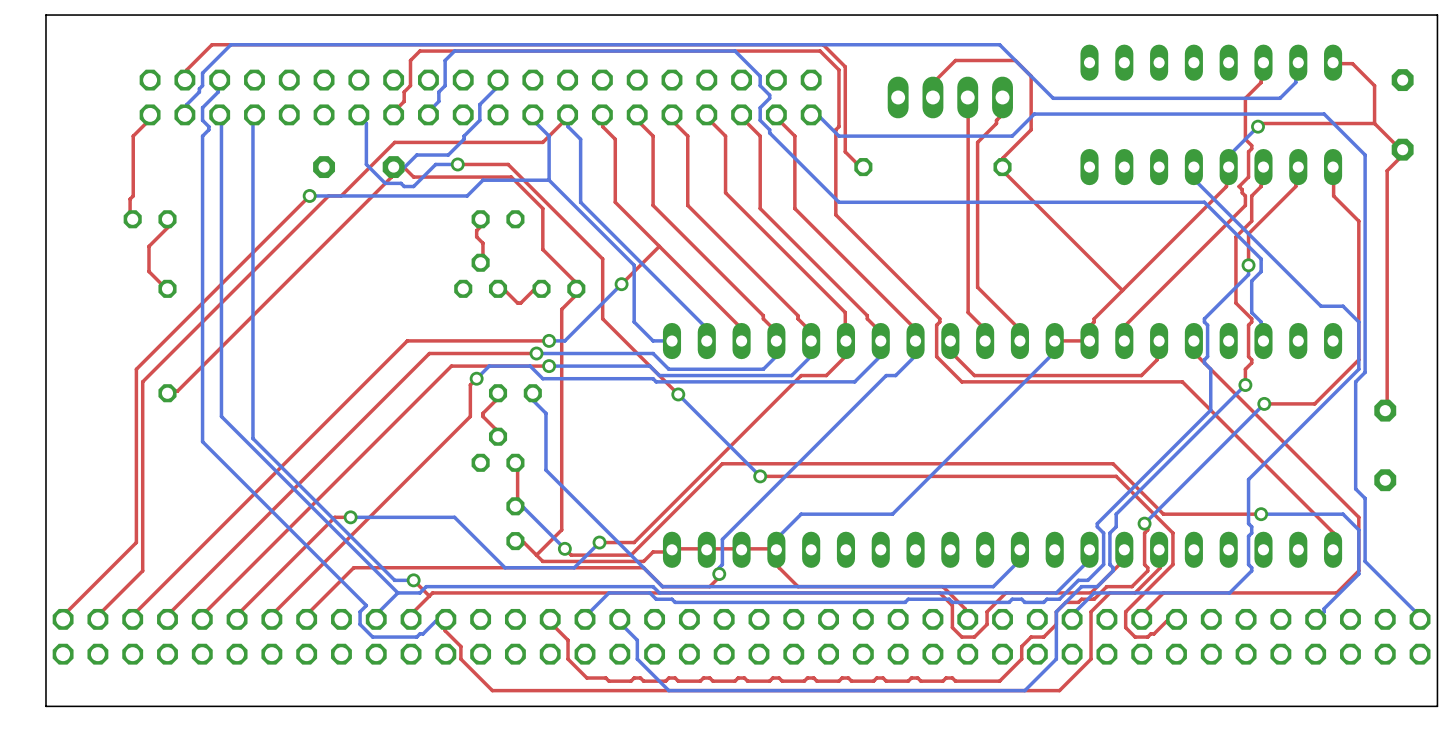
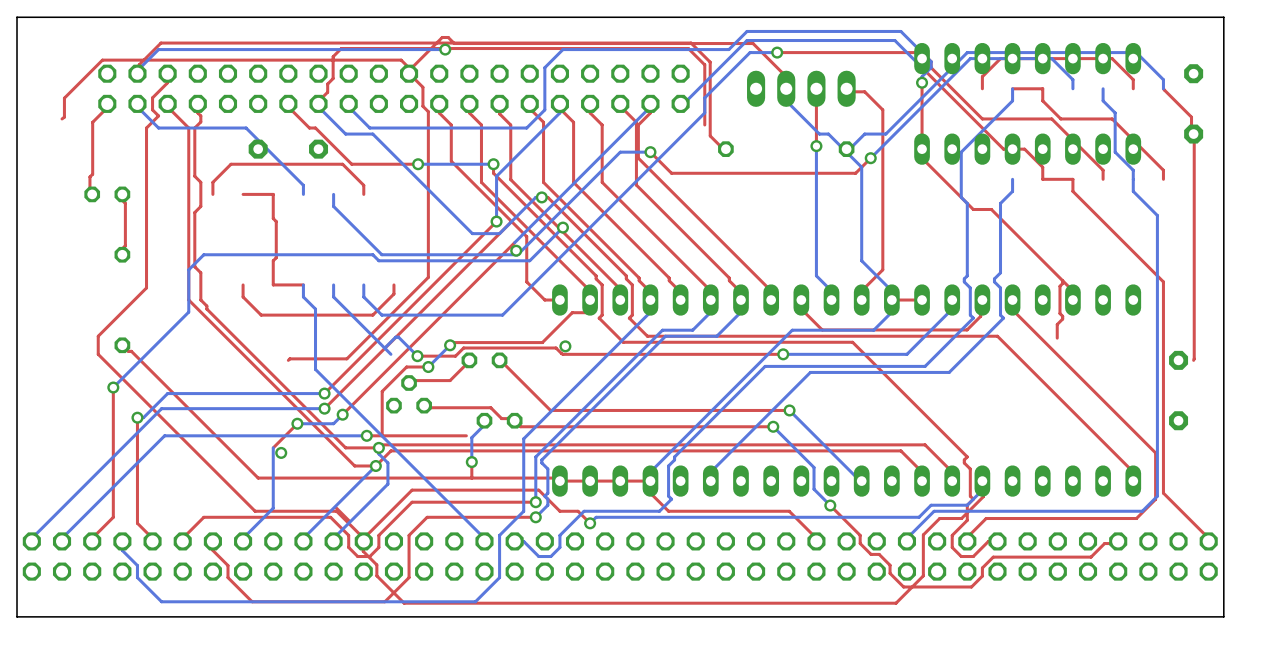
bottom track: none -> (445, 49) (158, 49) (137, 70) (137, 73)
via: none -> (445, 49)
top track: none -> (777, 52) (922, 52) (931, 61) (931, 67) (982, 118) (1051, 118) (1103, 170) (1103, 179)
bottom track: none -> (777, 52) (750, 52) (704, 97) (704, 112) (502, 315) (381, 315) (363, 297) (363, 284)
via: none -> (777, 52)
top track: (1263, 62) (1261, 63) (1261, 82) (1245, 98) (1245, 139) (1251, 145) (1251, 148) (1248, 151) (1248, 177) (1239, 186) (1245, 195) (1245, 205) (1125, 325) (1124, 341) -> none
bottom track: (1298, 62) (1295, 63) (1295, 82) (1280, 98) (1053, 98) (999, 44) (230, 44) (202, 73) (202, 85) (199, 92) (186, 104) (186, 114) (184, 114) -> (303, 194) (303, 185) (246, 128) (158, 128) (137, 106) (137, 103)
top track: (1333, 62) (1352, 63) (1374, 85) (1374, 123) -> none
top track: none -> (919, 64) (1003, 149) (1024, 149) (1042, 167) (1042, 179) (1072, 179) (1072, 191) (1163, 281) (1163, 493) (1208, 538) (1208, 541)
top track: none -> (167, 73) (167, 82) (152, 97) (152, 109) (158, 115) (146, 128) (146, 287) (98, 336) (98, 354) (255, 511) (336, 511) (363, 538) (412, 490) (538, 490) (559, 511) (578, 511) (590, 523)
bottom track: (219, 80) (218, 92) (202, 107) (202, 120) (208, 126) (208, 129) (202, 136) (202, 441) (366, 605) (360, 611) (360, 624) (372, 637) (416, 637) (423, 633) (435, 621) (445, 621) (445, 619) -> none
top track: none -> (409, 73) (422, 87) (422, 106) (428, 111) (428, 277) (346, 358) (288, 360)
top track: none -> (409, 73) (409, 68) (401, 60) (102, 60) (64, 98) (64, 117) (62, 118)
bottom track: (498, 80) (495, 82) (495, 88) (479, 104) (479, 120) (448, 155) (416, 155) (404, 167) (393, 167) -> none
via: none -> (922, 82)
top track: (932, 97) (933, 82) (955, 60) (1015, 60) (1031, 76) (1031, 129) (1002, 158) (1002, 170) (1122, 290) -> (786, 88) (786, 76) (753, 43) (454, 43) (448, 37) (442, 37) (409, 70) (409, 73)
top track: (967, 97) (968, 312) (983, 328) (985, 341) -> (816, 88) (816, 146)
top track: (1002, 97) (999, 98) (999, 117) (996, 123) (977, 142) (977, 287) (1018, 328) (1019, 341) -> (846, 88) (849, 91) (864, 91) (882, 109) (882, 269) (861, 290) (861, 300)
top track: none -> (1012, 88) (1042, 88) (1042, 100) (1060, 118) (1112, 118) (1163, 170) (1163, 179)
bottom track: none -> (1072, 88) (1072, 79) (1051, 58) (970, 58) (870, 158)
top track: none -> (1133, 88) (1133, 79) (1112, 58) (1000, 58) (982, 76) (982, 88)
top track: none -> (1163, 88) (1191, 117) (1191, 133) (1194, 136) (1193, 360)
bottom track: none -> (1163, 88) (1163, 79) (1136, 52) (967, 52) (885, 134) (864, 134) (849, 149) (843, 149)
top track: none -> (167, 103) (167, 106) (188, 128) (188, 300) (354, 465) (375, 465) (390, 450) (900, 450) (922, 472) (922, 481)
bottom track: (219, 114) (221, 117) (221, 416) (397, 592) -> none
bottom track: (254, 114) (252, 438) (394, 580) (413, 580) -> none
top track: none -> (288, 103) (288, 106) (309, 128) (315, 128) (351, 164) (418, 164)
bottom track: (358, 114) (366, 123) (366, 164) (385, 183) (401, 183) (404, 186) (413, 186) (435, 164) (457, 164) -> none
bottom track: none -> (318, 103) (318, 106) (345, 134) (372, 134) (472, 233) (499, 233) (535, 197) (541, 197)
bottom track: (428, 114) (426, 114) (438, 101) (438, 92) (445, 85) (445, 60) (454, 51) (735, 51) (760, 76) (760, 85) (769, 95) (769, 98) (760, 107) (760, 120) (769, 129) (769, 132) (838, 202) (1204, 202) (1261, 258) (1261, 271) (1251, 281) (1251, 312) (1261, 322) (1261, 340) (1263, 341) -> (348, 103) (348, 106) (369, 128) (526, 128) (544, 109) (544, 67) (562, 49) (728, 49) (747, 31) (900, 31) (931, 61) (931, 67) (922, 76) (922, 82)
top track: none -> (439, 103) (439, 112) (451, 125) (451, 161) (526, 236) (526, 281) (544, 300) (559, 300)
bottom track: (532, 114) (530, 117) (549, 136) (549, 180) -> none
top track: (567, 114) (568, 117) (542, 142) (394, 142) (341, 195) (328, 195) (142, 381) (142, 570) (98, 615) (97, 619) -> (469, 103) (469, 112) (481, 125) (481, 182) (590, 290) (590, 312)
bottom track: (567, 114) (568, 126) (580, 139) (580, 202) (706, 328) (706, 340) -> none
bottom track: none -> (559, 103) (559, 112) (496, 176) (496, 221)
top track: (706, 114) (706, 117) (725, 136) (725, 192) (845, 312) (845, 356) (826, 375) (801, 375) (634, 542) (599, 542) -> (590, 103) (590, 112) (602, 125) (602, 182) (710, 290) (710, 300)
top track: (776, 114) (775, 117) (794, 136) (794, 208) (914, 328) (915, 341) -> (650, 103) (650, 112) (638, 125) (638, 158) (771, 290) (771, 300)
bottom track: none -> (650, 103) (650, 106) (514, 242)
bottom track: (811, 114) (813, 117) (820, 117) (838, 136) (1012, 136) (1034, 114) (1324, 114) (1365, 155) (1365, 372) (1355, 381) (1355, 488) (1365, 498) (1365, 561) (1418, 615) (1420, 619) -> (680, 103) (683, 103) (747, 40) (894, 40) (919, 64)
top track: (1374, 123) (1402, 149) (1399, 151) (1399, 158) (1387, 170) (1387, 410) (1385, 410) -> none
top track: (1374, 123) (1261, 123) (1258, 126) -> none
top track: (838, 126) (835, 129) (835, 214) (939, 318) (936, 325) (936, 356) (961, 381) (1182, 381) (1333, 533) (1333, 549) -> (541, 197) (547, 197) (626, 275) (626, 278) (632, 284) (632, 315) (629, 318) (647, 336) (997, 336) (1133, 472) (1133, 481)
bottom track: (1258, 126) (1229, 155) (1228, 167) -> none
via: (1258, 126) -> none
bottom track: none -> (816, 146) (816, 275) (831, 290) (831, 300)
via: none -> (816, 146)
top track: (457, 164) (508, 164) (602, 258) (602, 318) (678, 394) -> none
via position: (457, 164) -> (418, 164)
bottom track: (1193, 167) (1194, 180) (1321, 306) (1343, 306) (1358, 322) (1358, 369) (1248, 479) (1248, 523) (1251, 526) (1251, 533) (1248, 536) (1248, 564) (1251, 570) (1229, 592) (1094, 592) (1072, 615) -> (1103, 88) (1103, 100) (1115, 112) (1115, 152) (1133, 170) (1133, 191) (1157, 215) (1157, 496) (1142, 511) (934, 511) (906, 538)
top track: (1228, 167) (1226, 167) (1226, 186) (1094, 318) (1091, 325) (1091, 340) (1054, 341) -> (922, 300) (891, 300)
top track: (1263, 167) (1261, 167) (1261, 186) (1251, 195) (1251, 221) (1235, 236) (1235, 303) -> (922, 82) (922, 158) (973, 209) (991, 209) (1049, 267)
top track: (1298, 167) (1295, 167) (1295, 186) (1248, 233) (1248, 265) -> none
top track: (1333, 167) (1333, 195) (1358, 221) (1358, 359) (1314, 403) (1264, 403) -> none
top track: none -> (650, 152) (671, 173) (855, 173) (870, 158)
bottom track: none -> (650, 152) (620, 152) (517, 254) (381, 254) (333, 206) (333, 194)
via: none -> (650, 152)
via: none -> (870, 158)
bottom track: (549, 180) (634, 265) (634, 322) (653, 340) (671, 340) -> none
bottom track: (549, 180) (482, 180) (467, 195) (309, 195) -> none
bottom track: none -> (493, 164) (418, 164)
via: none -> (493, 164)
top track: (309, 195) (136, 369) (136, 542) (63, 615) (63, 619) -> none
via: (309, 195) -> none
bottom track: none -> (1012, 179) (1012, 191) (1000, 203) (1000, 272) (994, 278) (994, 281) (1000, 287) (1000, 315) (1003, 318) (949, 372) (810, 372) (710, 472) (710, 481)
top track: (167, 219) (167, 227) (149, 246) (149, 271) (167, 288) -> (122, 194) (122, 200) (125, 203) (125, 245) (122, 248) (122, 254)
top track: none -> (243, 194) (273, 194) (273, 218) (276, 221) (276, 257) (273, 260) (273, 284) (303, 284)
top track: none -> (363, 194) (363, 185) (342, 164) (231, 164) (212, 182) (212, 194)
top track: (480, 219) (479, 227) (476, 230) (476, 236) (482, 243) (482, 262) (480, 262) -> none
part: (498, 219) -> none
via: none -> (541, 197)
top track: (659, 246) (621, 284) -> none
top track: none -> (496, 221) (324, 393)
via: none -> (496, 221)
top track: none -> (511, 221) (324, 408)
bottom track: none -> (562, 227) (529, 260) (378, 260) (372, 254) (203, 254) (188, 269) (188, 312) (113, 387)
via: none -> (562, 227)
bottom track: (1248, 265) (1248, 274) (1204, 318) (1207, 325) (1207, 356) (1204, 362) (1210, 369) (1210, 410) (1097, 523) (1097, 526) (1103, 533) (1103, 564) (1087, 580) (1078, 580) (1059, 599) (1046, 599) (1043, 602) (1024, 602) (1021, 599) (1012, 599) (1009, 602) (952, 602) (949, 599) (908, 599) (905, 602) (675, 602) (671, 599) (656, 599) (649, 592) (608, 592) (583, 618) (585, 619) -> (303, 284) (303, 297) (315, 309) (315, 369) (484, 538) (484, 541)
via: (1248, 265) -> none
top track: none -> (514, 242) (342, 414)
part: (480, 275) -> none
bottom track: (621, 284) (564, 340) (549, 340) -> none
top track: (541, 288) (533, 290) (520, 303) (517, 303) (505, 290) (498, 288) -> none
part: (558, 288) -> none
bottom track: none -> (333, 284) (333, 297) (390, 354)
top track: none -> (393, 284) (393, 293) (372, 315) (261, 315) (243, 297) (243, 284)
top track: (549, 340) (407, 340) (133, 615) (132, 619) -> (113, 387) (113, 517) (92, 538) (92, 541)
via: (549, 340) -> none
top track: none -> (590, 300) (591, 312) (572, 312) (542, 342) (452, 342) (450, 345)
bottom track: (776, 341) (775, 356) (763, 369) (668, 369) (653, 353) (536, 353) -> (650, 300) (650, 312) (523, 438) (523, 511) (499, 535) (499, 577) (475, 601) (161, 601) (137, 577) (137, 565) (122, 550) (122, 541)
bottom track: (811, 341) (810, 356) (791, 375) (659, 375) (649, 366) (549, 366) -> none
bottom track: none -> (710, 300) (710, 312) (692, 330) (662, 330) (535, 456) (535, 502)
bottom track: (880, 341) (879, 356) (854, 381) (656, 381) (653, 378) (542, 378) (530, 366) (489, 366) (476, 378) -> (740, 300) (740, 312) (716, 336) (665, 336) (541, 459) (541, 462) (547, 469) (547, 493) (544, 496) (547, 499) (547, 505) (535, 517)
bottom track: (915, 341) (914, 356) (895, 375) (886, 375) (722, 539) (722, 564) (719, 567) (719, 574) -> none
bottom track: (1054, 341) (1053, 353) (892, 514) (801, 514) (779, 536) (779, 548) (776, 549) -> (786, 88) (786, 100) (819, 134) (828, 134) (861, 167) (861, 260) (891, 290) (891, 312) (873, 330) (792, 330) (650, 472) (650, 481)
bottom track: none -> (952, 300) (952, 309) (906, 354) (783, 354)
top track: (536, 353) (429, 353) (167, 615) (167, 619) -> none
via: (536, 353) -> none
top track: (549, 366) (451, 366) (202, 615) (202, 619) -> (137, 417) (137, 523) (152, 538) (152, 541)
via: (549, 366) -> none
top track: (476, 378) (470, 385) (470, 416) (271, 615) (271, 619) -> (535, 517) (427, 517) (409, 535) (409, 577) (384, 601) (252, 601) (227, 577) (227, 565) (212, 550) (212, 541)
via: (476, 378) -> none
bottom track: (1245, 385) (1116, 514) (1116, 526) (1109, 533) (1109, 564) (1113, 570) (1097, 586) (1081, 586) (1056, 611) (1056, 659) (1024, 690) (668, 690) (637, 659) (637, 640) (618, 621) (619, 619) -> (1012, 88) (1012, 100) (961, 152) (961, 197) (967, 203) (967, 275) (964, 281) (970, 287) (970, 315) (973, 318) (925, 366) (765, 366) (674, 456) (674, 459) (668, 465) (668, 496) (671, 499) (659, 511) (584, 511) (559, 535) (559, 547) (550, 556) (538, 556) (523, 541) (514, 541)
via: (1245, 385) -> none
top track: (167, 393) (167, 391) (177, 391) (391, 177) (391, 167) (404, 167) (413, 177) (511, 177) (542, 208) (542, 249) (574, 281) (574, 287) (576, 288) (574, 290) (574, 296) (561, 309) (561, 529) (536, 555) -> none
top track: (498, 393) (495, 394) (495, 400) (482, 413) (482, 416) (495, 429) (495, 435) (498, 436) -> (469, 360) (450, 380) (409, 380) (409, 383)
part: (515, 393) -> none
bottom track: (532, 393) (533, 400) (545, 413) (545, 470) (662, 586) (993, 586) (1018, 561) (1019, 549) -> (789, 410) (861, 481)
bottom track: none -> (450, 345) (428, 367)
via: none -> (450, 345)
bottom track: (678, 394) (760, 476) -> none
bottom track: none -> (384, 348) (395, 337) (398, 337) (417, 356)
top track: none -> (783, 354) (562, 354) (556, 348) (463, 348) (455, 356) (417, 356)
via: none -> (783, 354)
bottom track: (1264, 403) (1144, 523) -> none
via: (1264, 403) -> none
via: none -> (417, 356)
part: none -> (484, 360)
top track: none -> (499, 360) (550, 410) (789, 410)
top track: none -> (428, 367) (406, 367) (382, 391) (382, 435)
via: none -> (428, 367)
via: none -> (113, 387)
bottom track: none -> (324, 393) (167, 393) (143, 417) (137, 417)
via: none -> (324, 393)
top track: (515, 462) (517, 463) (517, 504) (515, 506) -> (424, 405) (425, 407) (490, 407) (501, 418) (512, 418) (520, 426) (773, 426)
bottom track: none -> (324, 408) (161, 408) (31, 538) (31, 541)
via: none -> (324, 408)
via: none -> (789, 410)
bottom track: none -> (342, 414) (333, 423) (297, 423)
via: none -> (342, 414)
via: none -> (137, 417)
top track: (760, 476) (1116, 476) (1172, 533) (1172, 564) (1125, 611) (1125, 627) (1135, 637) (1147, 637) (1154, 633) (1166, 621) (1176, 621) (1176, 619) -> (493, 164) (493, 173) (596, 275) (596, 278) (602, 284) (602, 315) (599, 318) (623, 342) (852, 342) (967, 456) (964, 462) (970, 469) (970, 496) (973, 499) (967, 505) (967, 520) (952, 535) (952, 547) (961, 556) (973, 556) (988, 541) (997, 541)
via: (760, 476) -> none
bottom track: none -> (484, 420) (482, 421) (482, 426) (471, 437) (471, 462)
part: none -> (499, 420)
top track: none -> (297, 423) (273, 447)
via: none -> (297, 423)
bottom track: none -> (773, 426) (814, 467) (814, 489) (830, 505)
via: none -> (773, 426)
bottom track: none -> (366, 435) (164, 435) (62, 538) (62, 541)
via: none -> (366, 435)
top track: none -> (466, 435) (366, 435)
bottom track: (515, 506) (523, 507) (564, 548) -> none
bottom track: none -> (273, 447) (273, 508) (243, 538) (243, 541)
bottom track: none -> (378, 447) (378, 453) (387, 462) (387, 484) (333, 538) (333, 541)
via: none -> (378, 447)
top track: (1261, 514) (1163, 514) (1113, 463) (722, 463) (631, 555) (571, 555) (564, 548) -> none
bottom track: (1261, 514) (1343, 514) (1358, 529) (1358, 574) (1315, 619) -> none
via: (1261, 514) -> none
top track: (350, 517) (334, 517) (237, 615) (237, 619) -> (535, 502) (412, 502) (378, 535) (378, 547) (369, 556) (357, 556) (348, 547) (348, 535) (330, 517) (203, 517) (182, 538) (182, 541)
bottom track: (350, 517) (454, 517) (505, 567) (574, 567) (599, 542) -> none
part: (515, 523) -> none
top track: (1144, 523) (1147, 526) (1144, 533) (1144, 564) (1147, 570) (1131, 586) (1106, 586) (1094, 599) (1065, 602) (1056, 611) (1056, 624) (1043, 637) (1031, 637) (1021, 646) (1021, 659) (999, 681) (955, 681) (952, 678) (946, 678) (942, 681) (920, 681) (917, 678) (911, 678) (908, 681) (886, 681) (883, 678) (876, 678) (873, 681) (851, 681) (848, 678) (842, 678) (838, 681) (816, 681) (813, 678) (807, 678) (804, 681) (782, 681) (779, 678) (772, 678) (769, 681) (747, 681) (744, 678) (738, 678) (735, 681) (712, 681) (709, 678) (703, 678) (700, 681) (678, 681) (675, 678) (668, 678) (665, 681) (643, 681) (640, 678) (634, 678) (631, 681) (608, 681) (605, 678) (586, 678) (568, 659) (568, 640) (549, 621) (550, 619) -> none
via: (1144, 523) -> none
top track: none -> (471, 462) (471, 478)
via: none -> (471, 462)
via: none -> (375, 465)
top track: (515, 541) (523, 542) (542, 561) (643, 561) (653, 551) (671, 551) (671, 548) (775, 548) (779, 551) (779, 567) (798, 586) (942, 586) (965, 608) (965, 618) (967, 619) -> (122, 345) (128, 351) (131, 351) (258, 478) (556, 478) (559, 481) (650, 481) (650, 493) (668, 511) (789, 511) (816, 538) (816, 541)
via: (599, 542) -> none
via: (564, 548) -> none
bottom track: (1089, 549) (1087, 561) (1056, 592) (659, 592) (653, 586) (426, 586) (419, 592) (397, 592) -> none
top track: (1124, 549) (1122, 561) (1091, 592) (1005, 592) (987, 611) (987, 624) (974, 637) (961, 637) (952, 627) (952, 605) (939, 592) (432, 592) (413, 611) (413, 618) (411, 619) -> (952, 481) (952, 472) (925, 444) (381, 444) (378, 447) (345, 447) (206, 309) (206, 306) (200, 300) (200, 272) (194, 266) (194, 212) (200, 206) (200, 182) (194, 176) (194, 128) (200, 121) (197, 103)
bottom track: none -> (982, 481) (982, 490) (967, 505) (931, 505) (919, 517) (596, 517) (590, 523)
via: none -> (535, 502)
top track: (719, 574) (719, 577) (709, 586) (662, 586) (643, 567) (353, 567) (309, 611) (309, 618) (306, 619) -> none
via position: (719, 574) -> (590, 523)
top track: none -> (830, 505) (860, 535) (860, 543) (871, 554) (879, 554) (890, 565) (890, 573) (903, 586) (971, 586) (982, 576) (982, 567) (993, 557) (1091, 557) (1104, 543) (1118, 543) (1118, 541)
via: none -> (830, 505)
via: (413, 580) -> none
via: none -> (535, 517)
bottom track: (397, 592) (378, 611) (378, 618) (376, 619) -> (375, 465) (303, 538) (303, 541)

